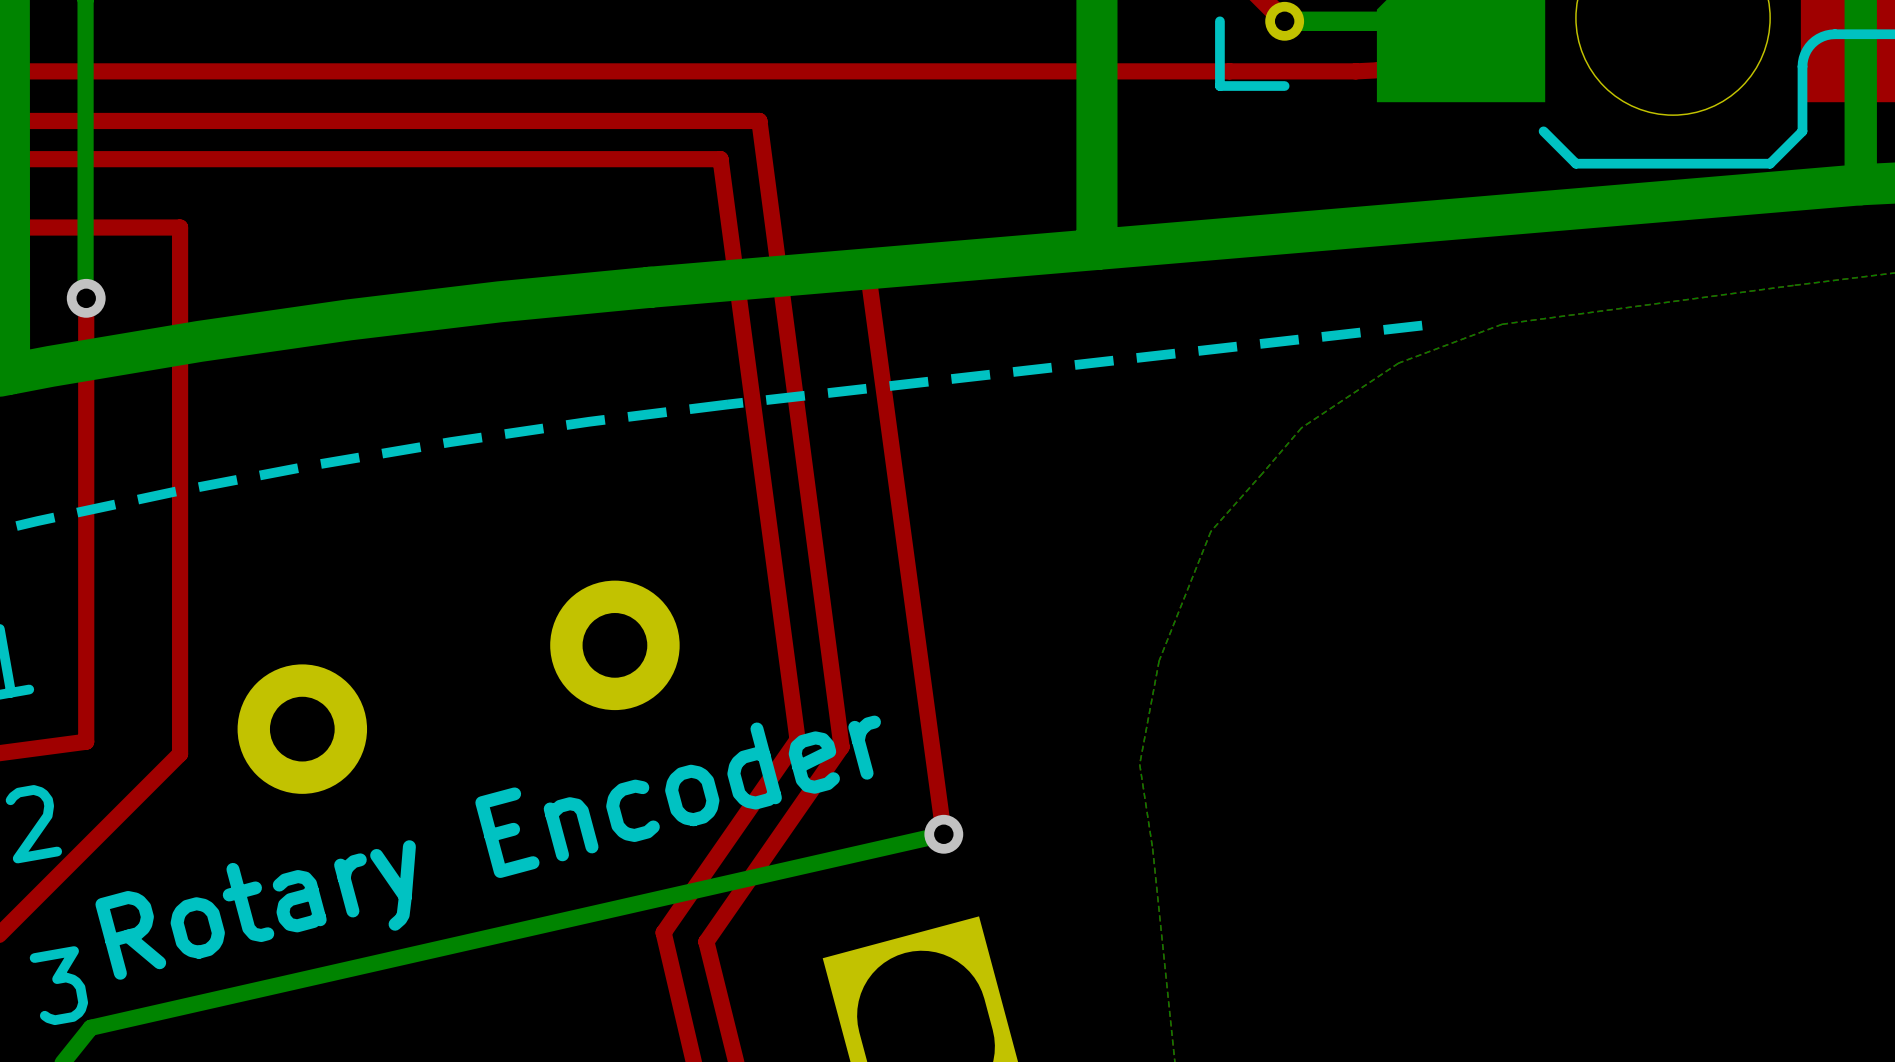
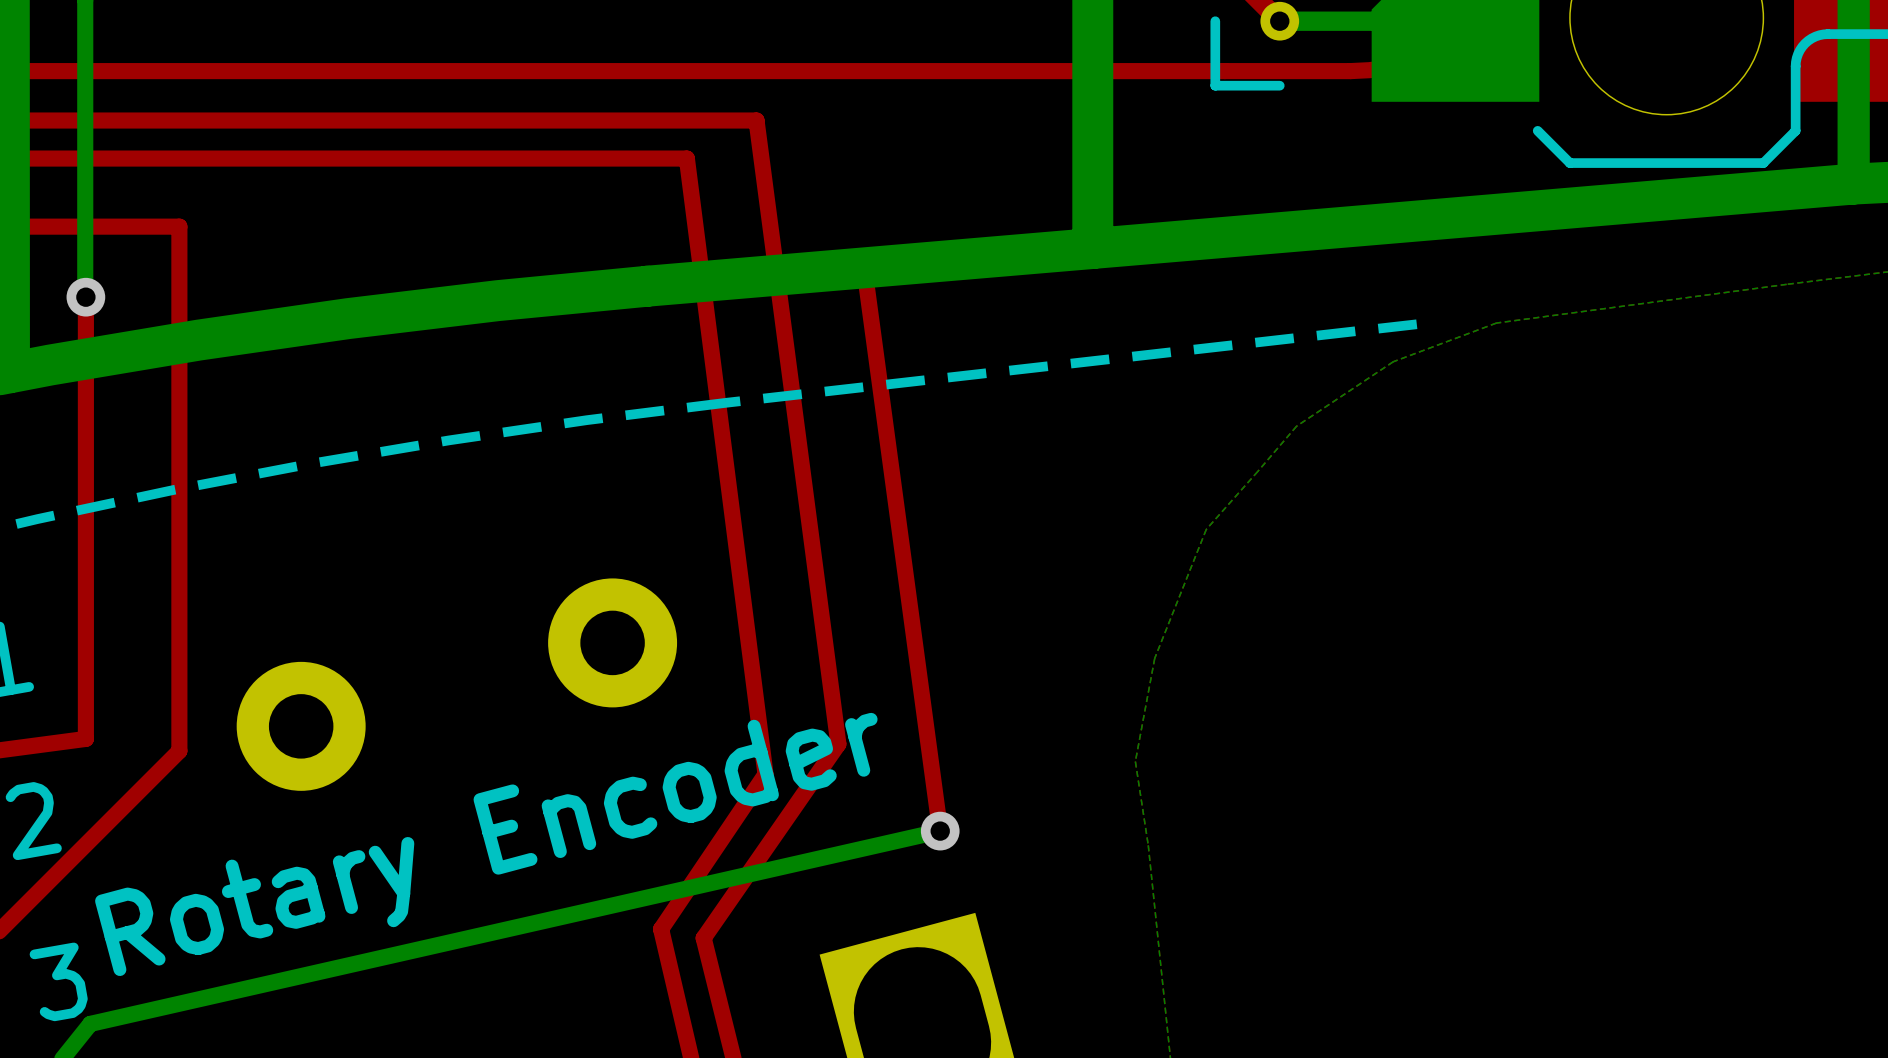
top track: (689, 159) (720, 159) (797, 739) (663, 932) -> (686, 158) (765, 774) (661, 929)

